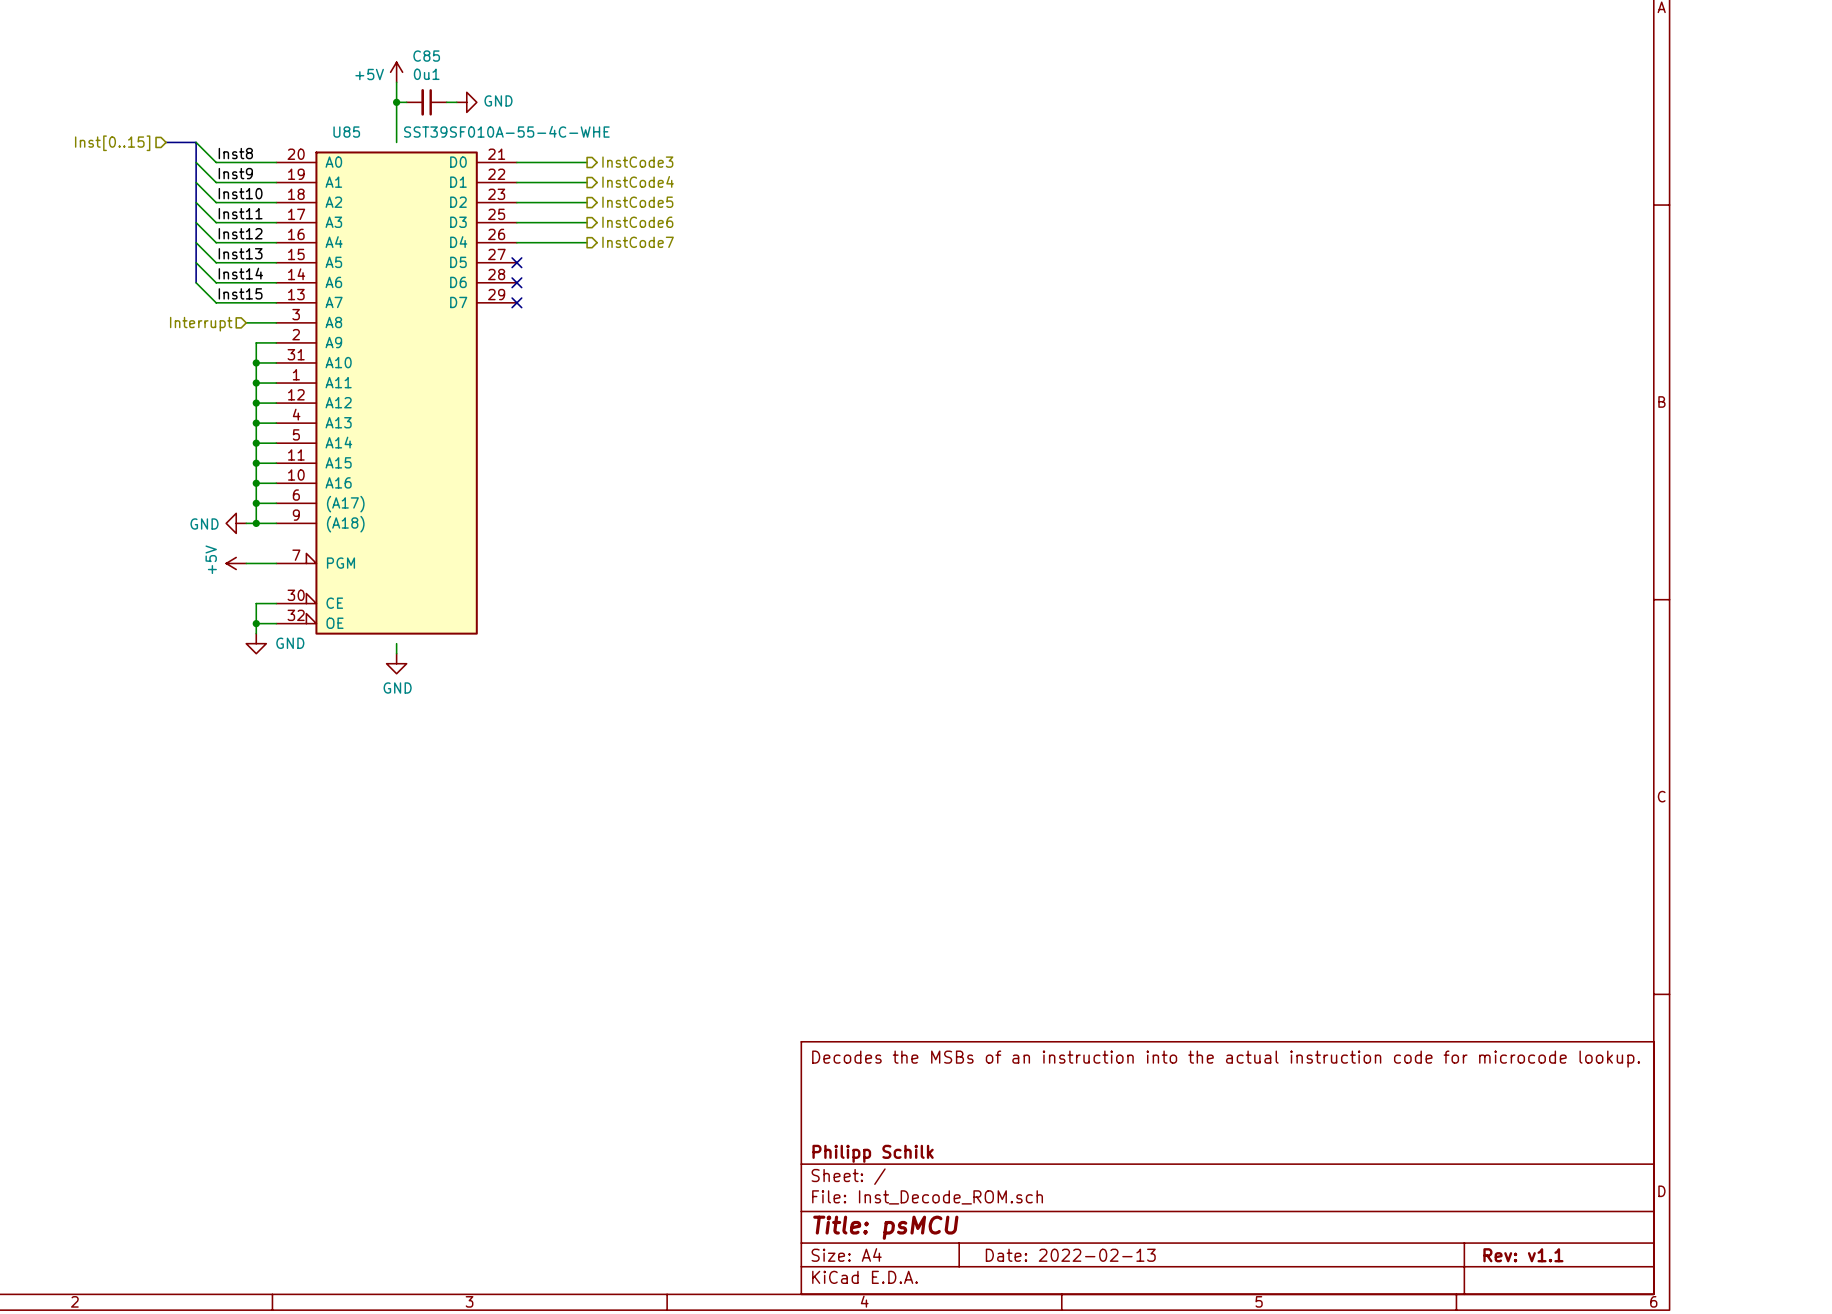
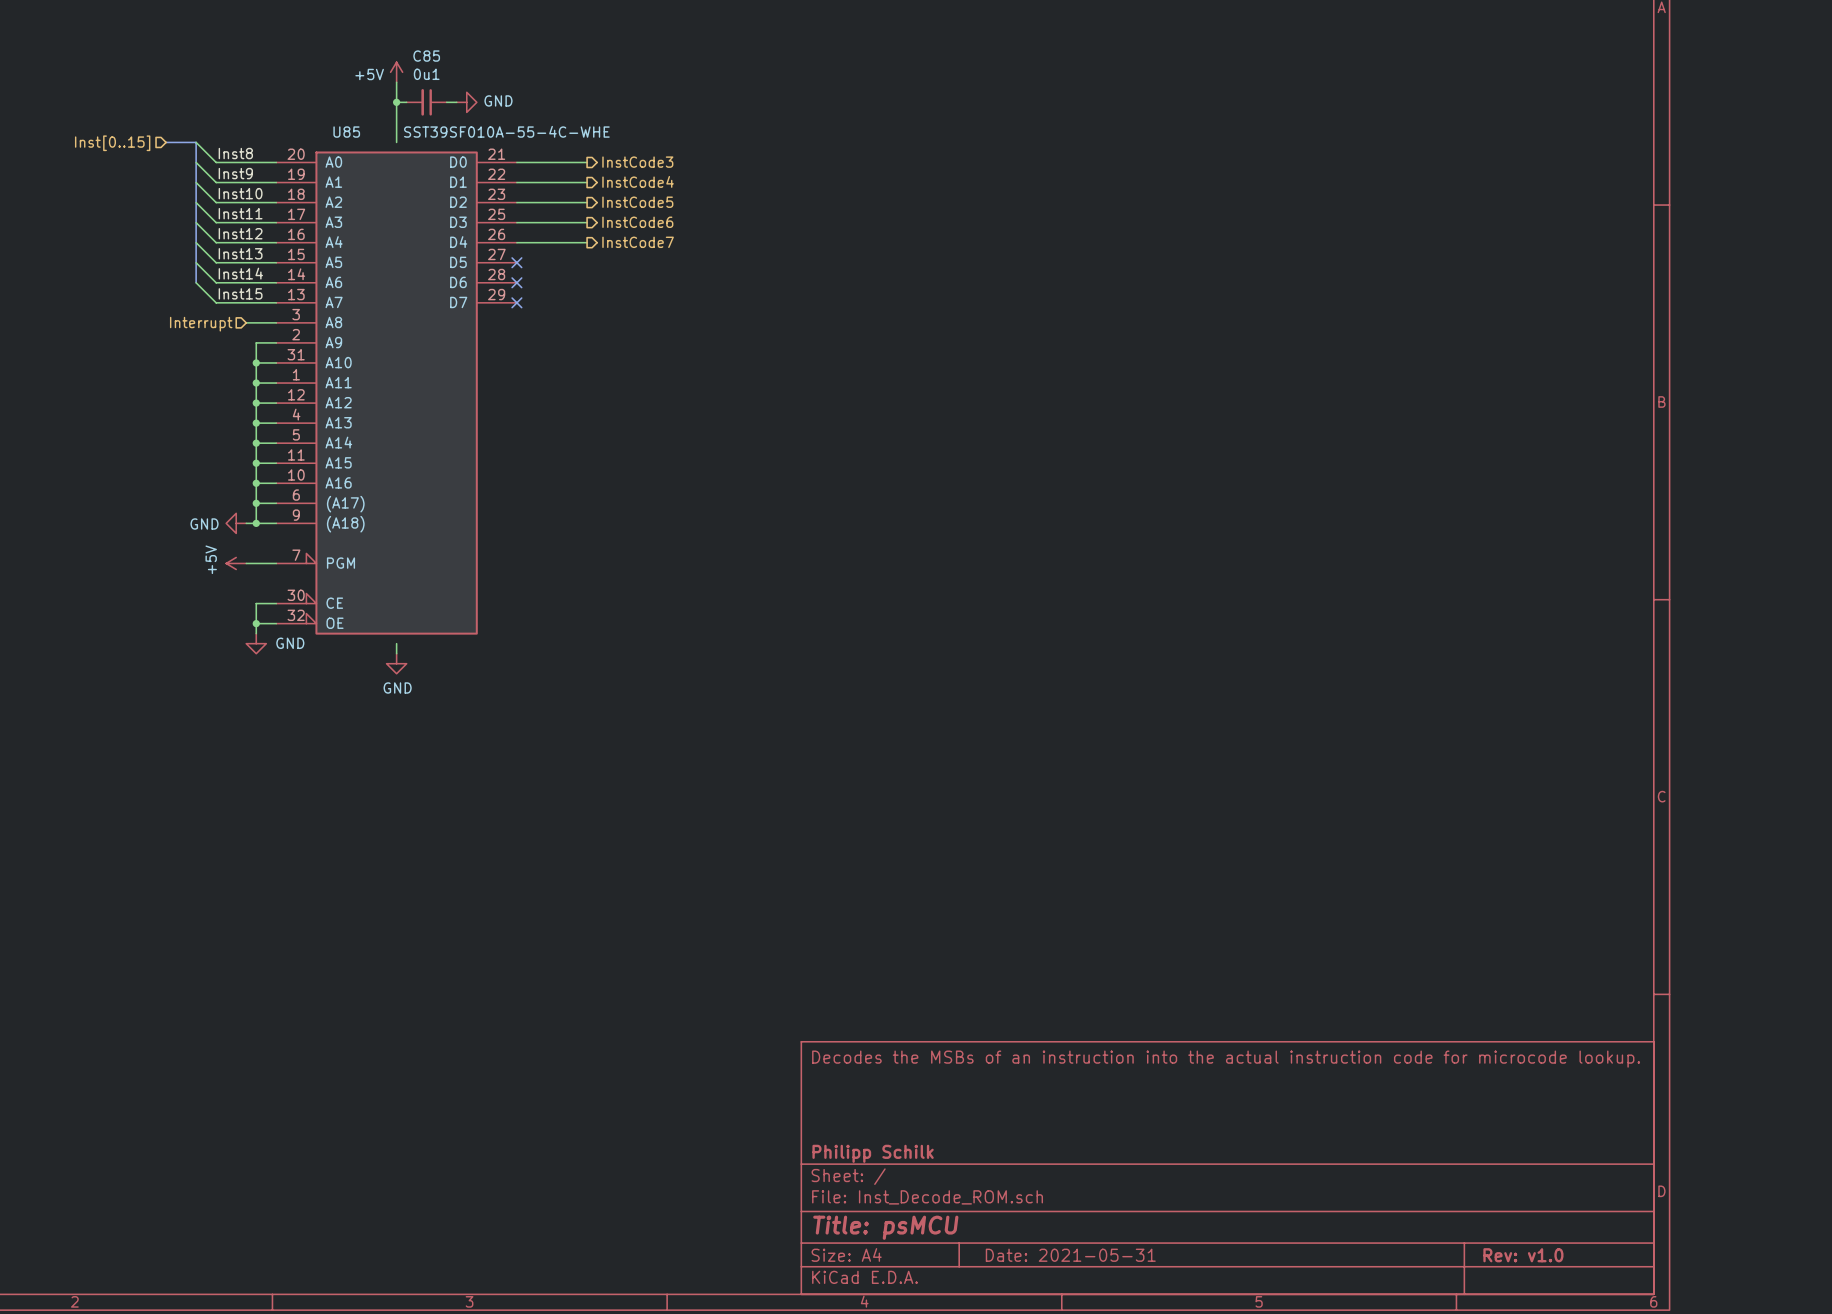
title block: Date: 2022-02-13 (1070, 1255) -> Date: 2021-05-31 (1070, 1255)
title block: Rev: v1.1 (1523, 1255) -> Rev: v1.0 (1523, 1255)

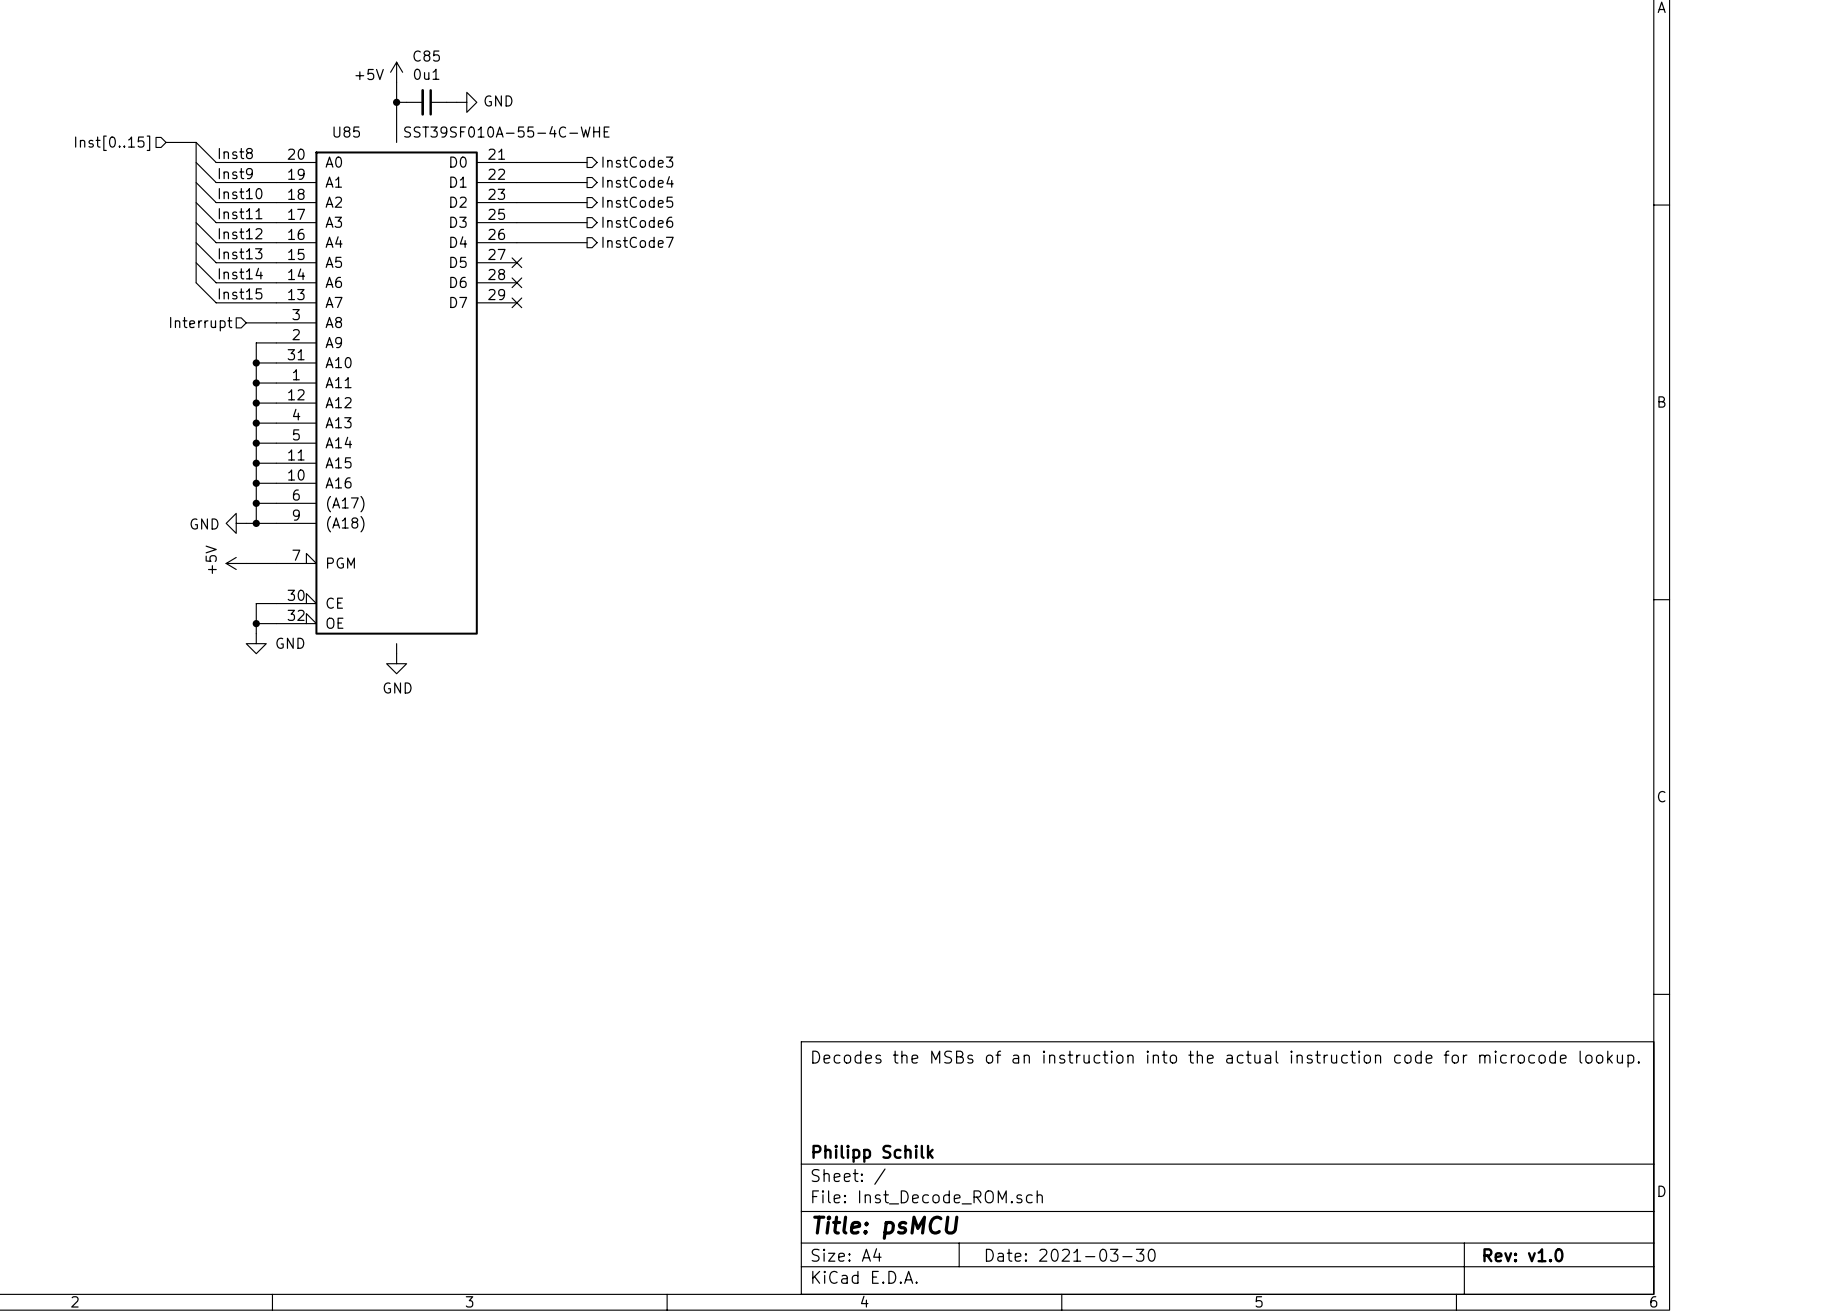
title block: Date: 2021-05-31 (1070, 1255) -> Date: 2021-03-30 (1070, 1255)

